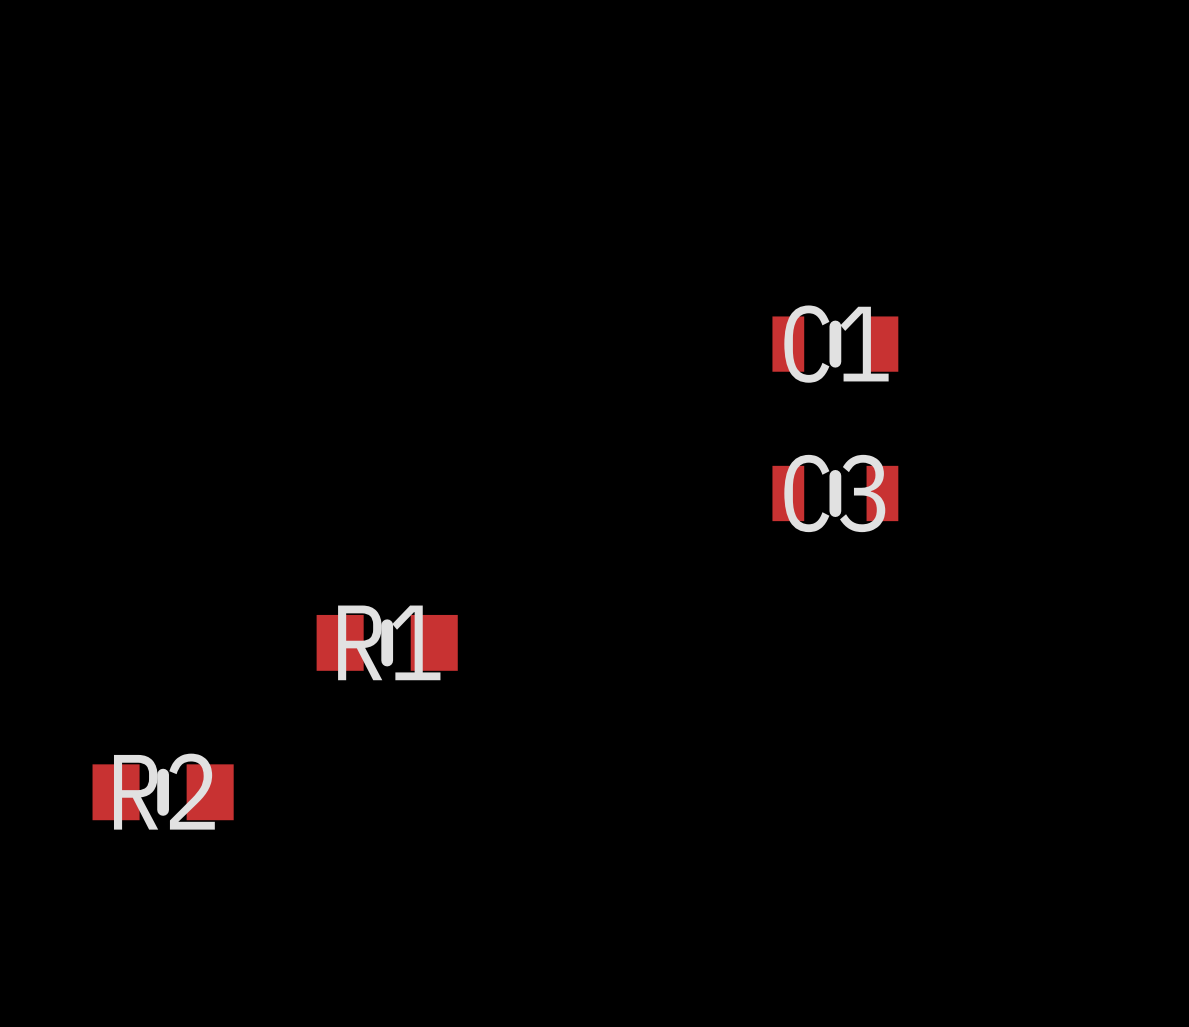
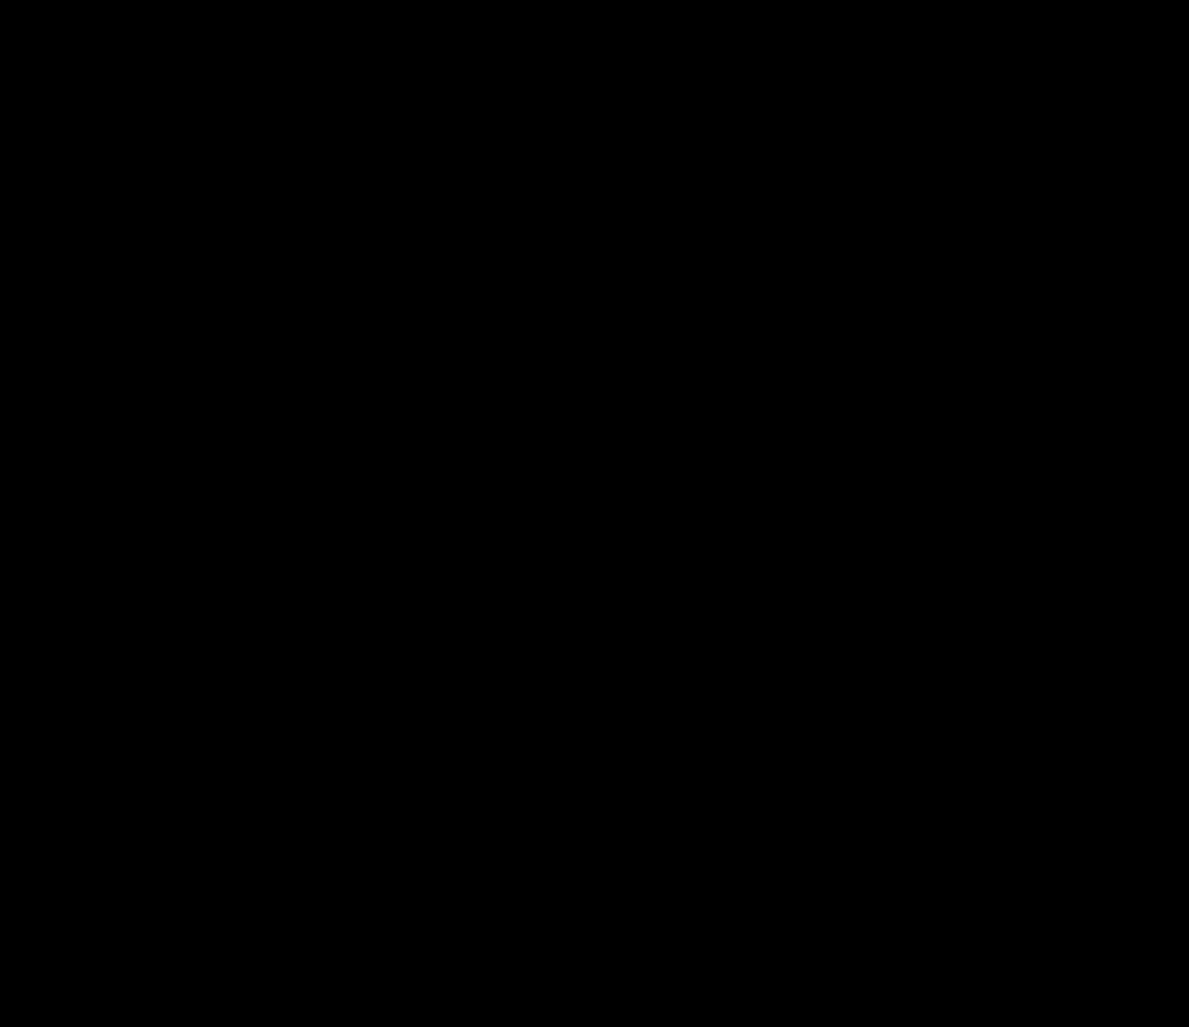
C1: (835, 344) -> none
C3: (835, 493) -> none
R1: (387, 642) -> none
R2: (163, 792) -> none

